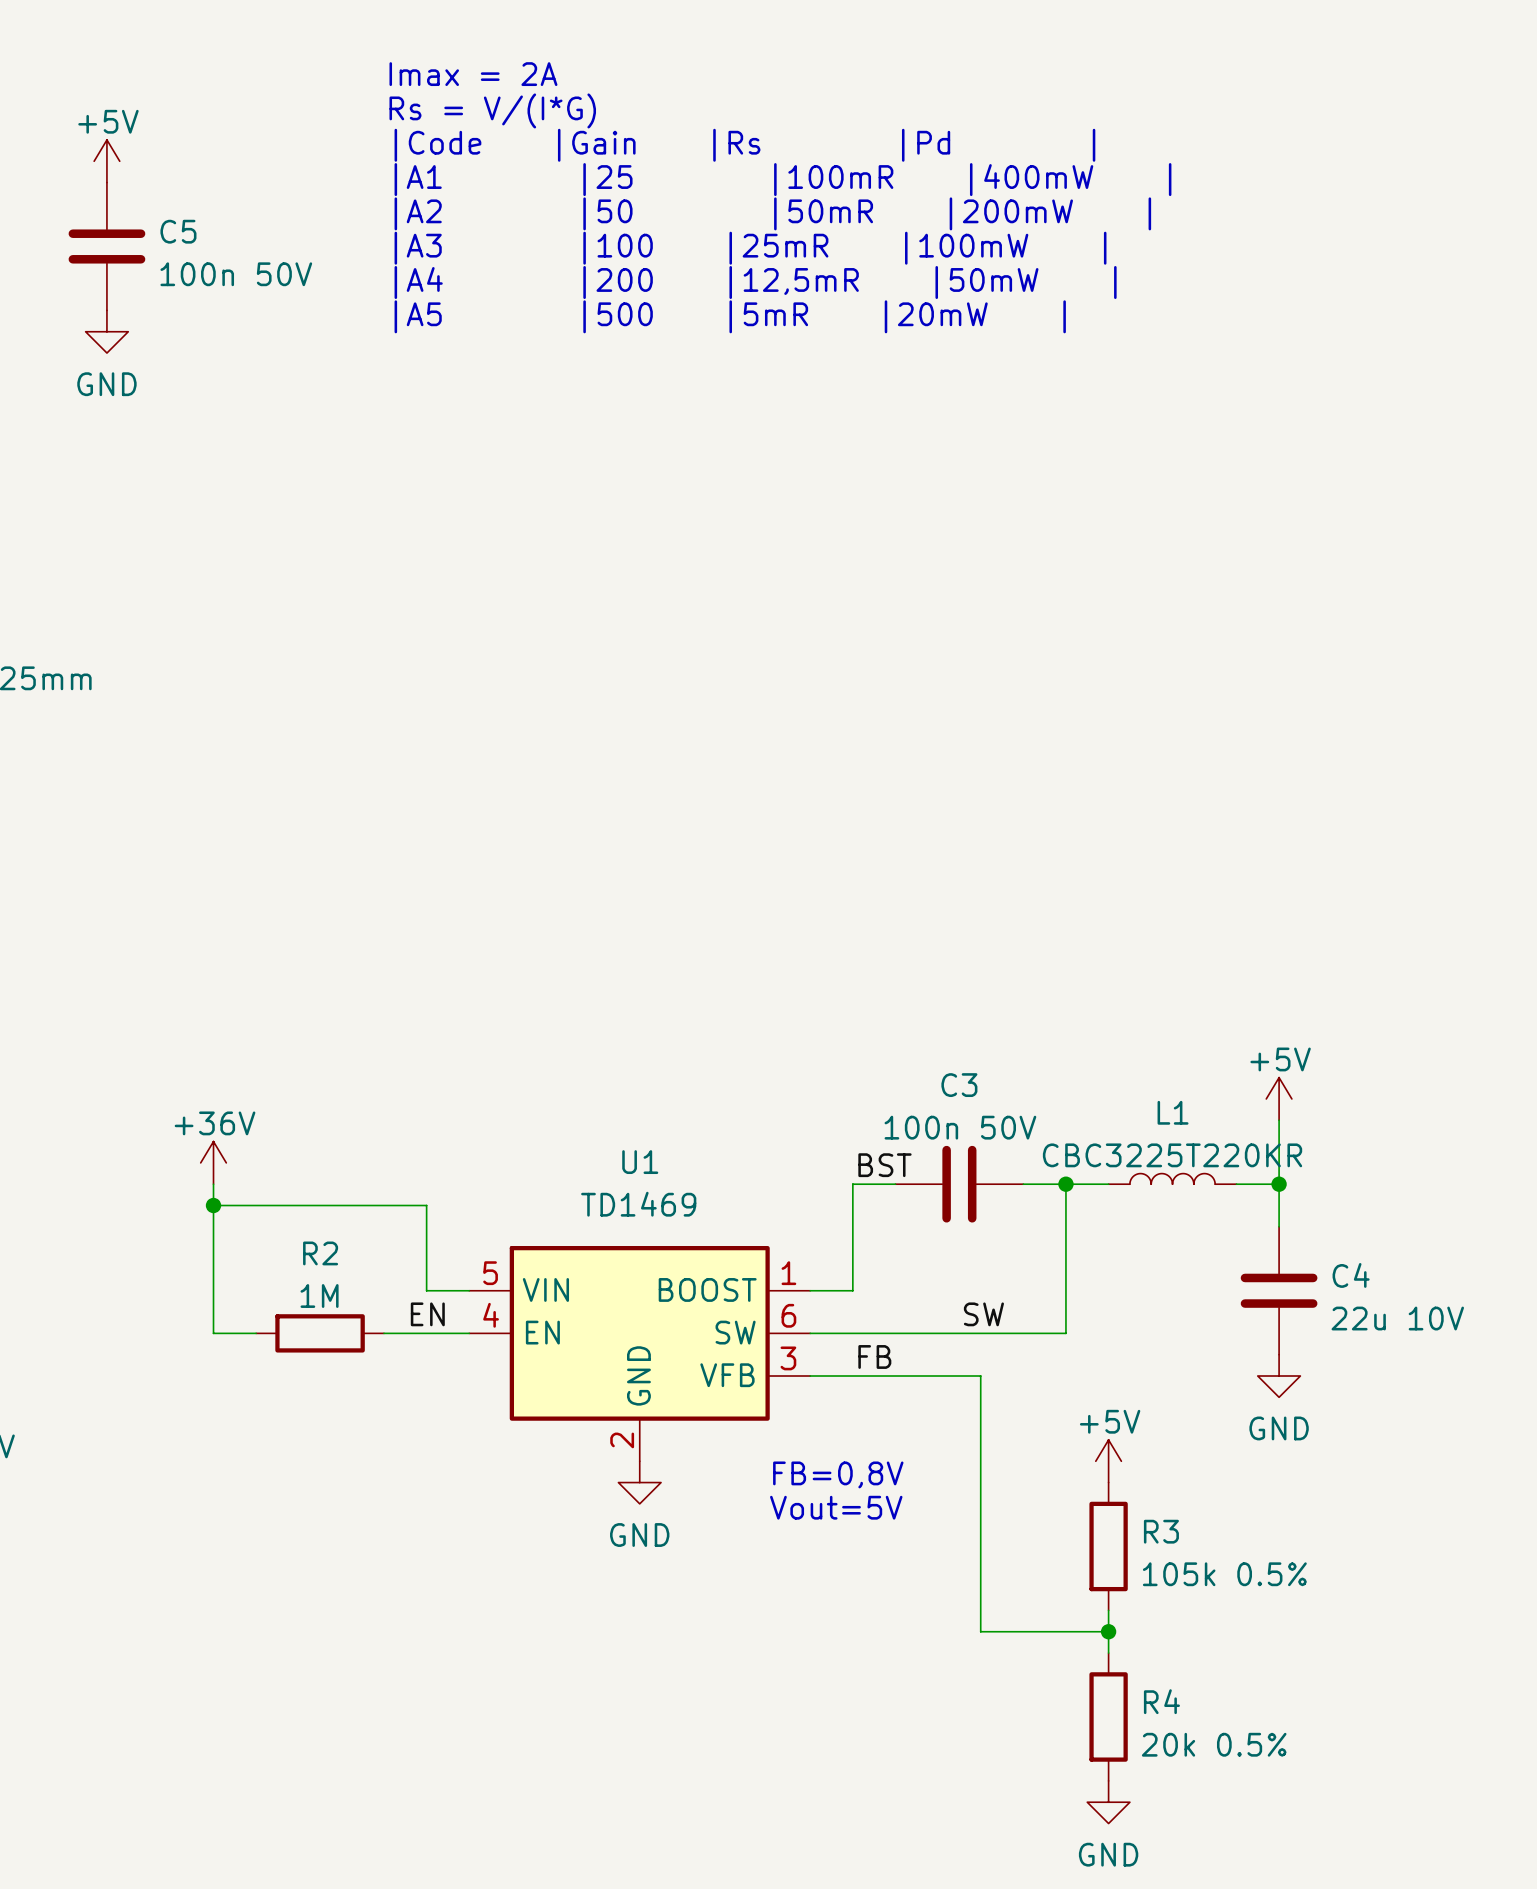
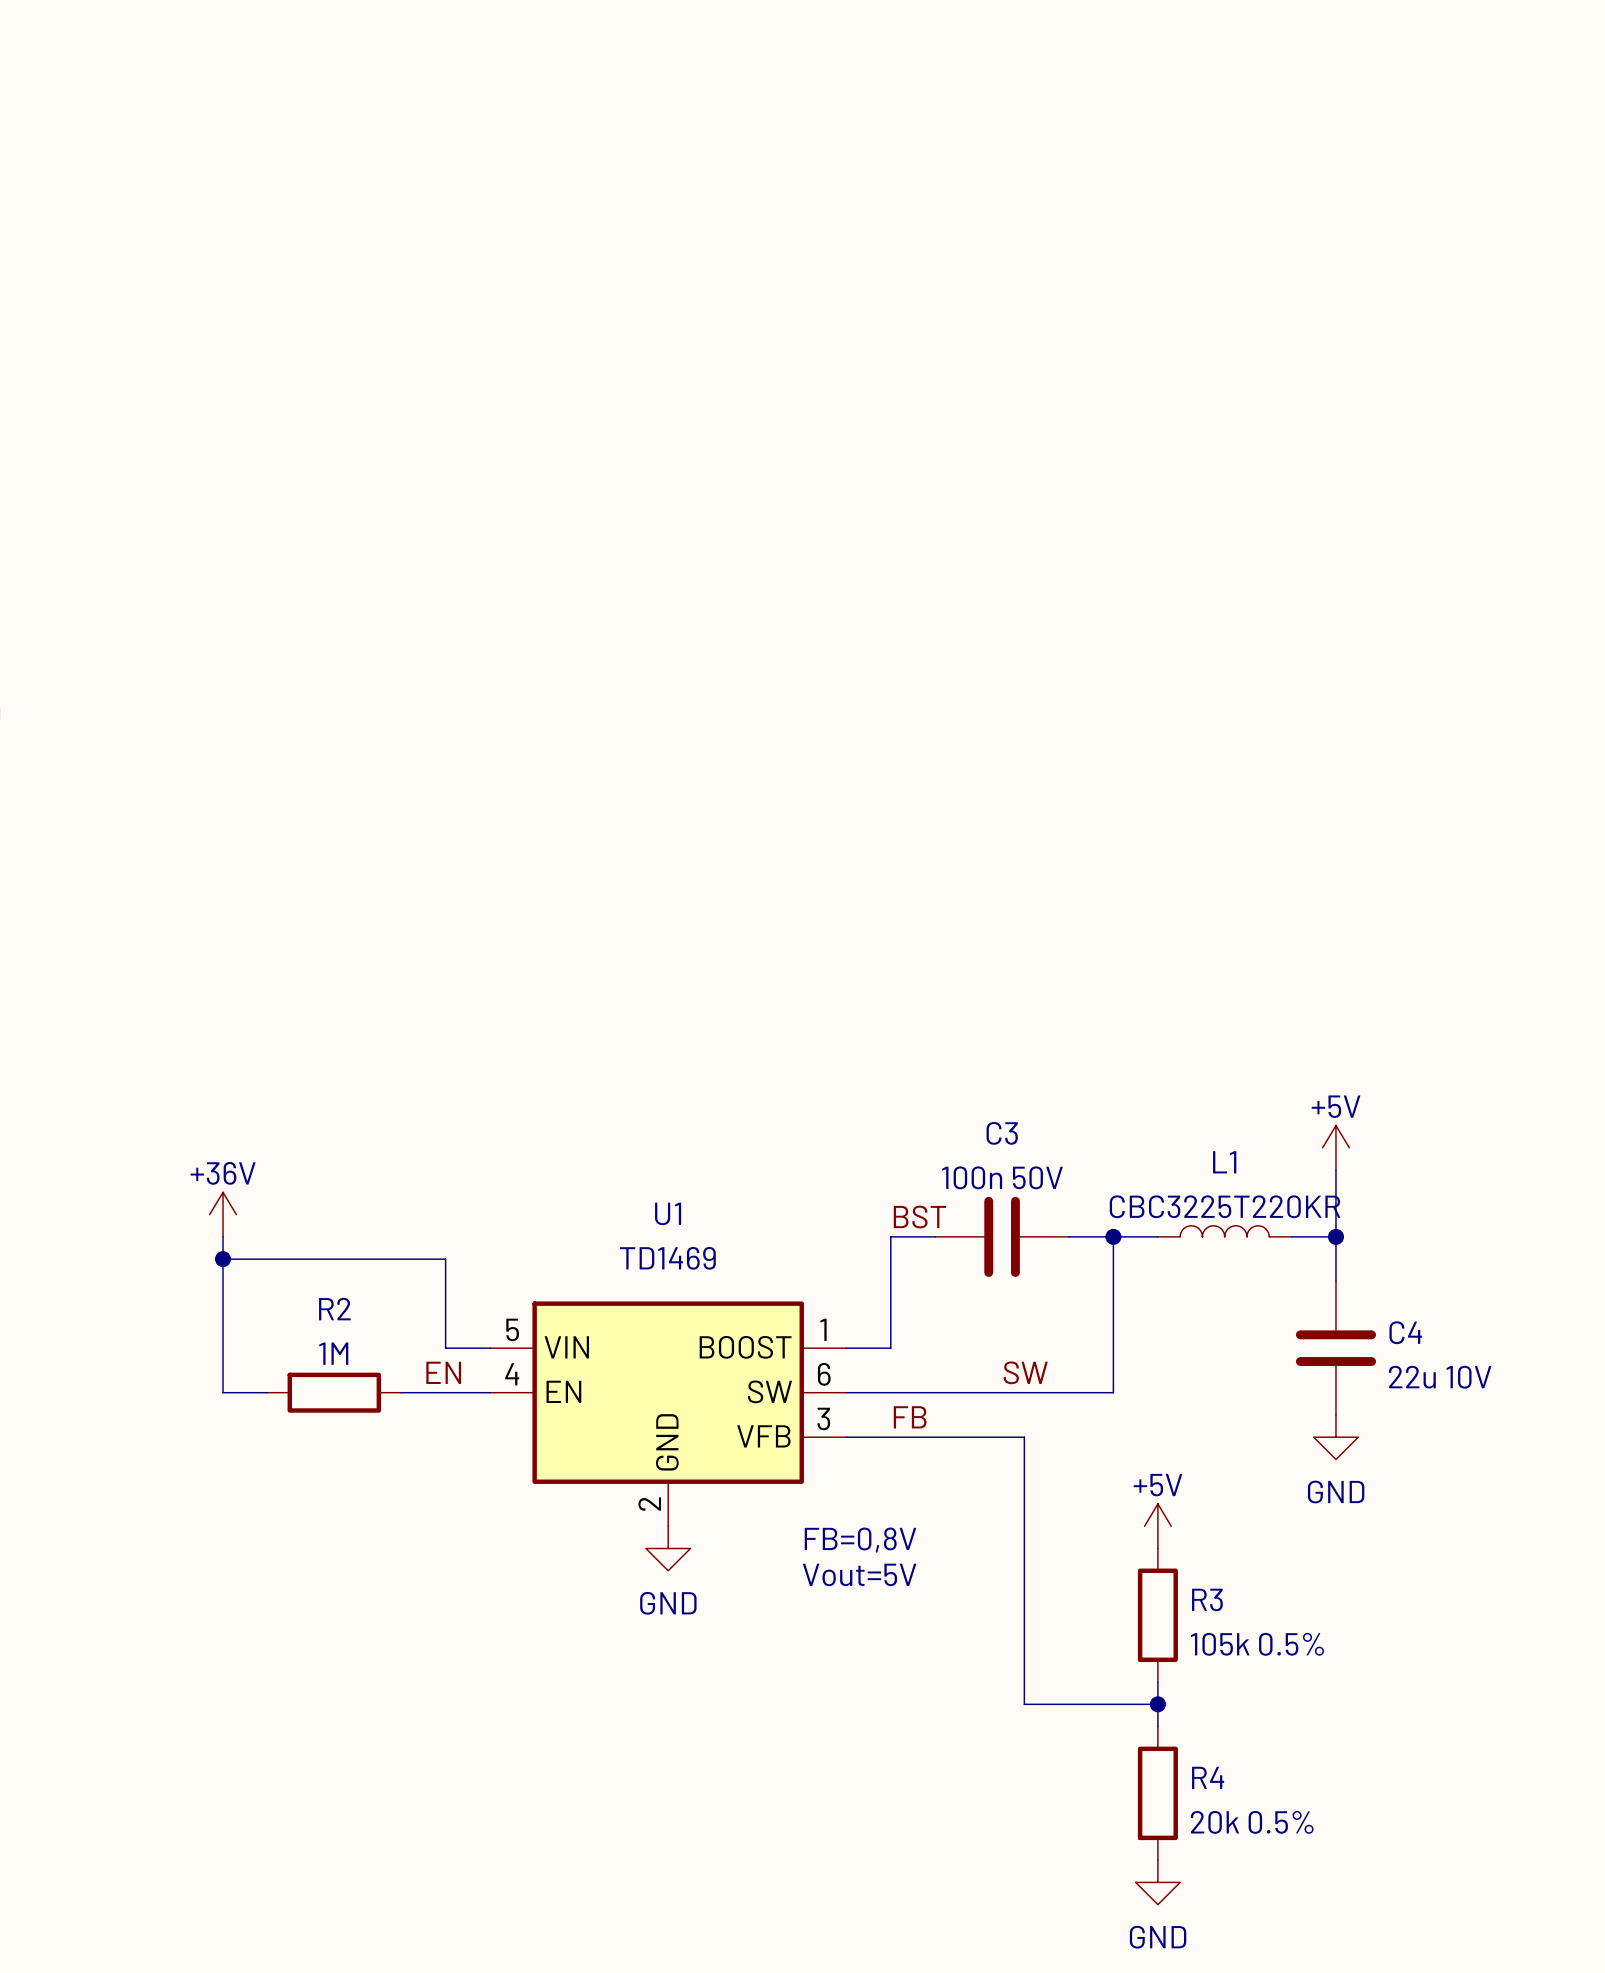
text: Imax = 2A (473, 74) -> none
text: Rs = V/(I*G) (492, 110) -> none
text: |Code |Gain |Rs |Pd | (744, 145) -> none
power symbol: +5V (106, 161) -> none
text: |A1 |25 |100mR |400mW | (782, 179) -> none
text: |A2 |50 |50mR |200mW | (772, 213) -> none
C5: 100n 50V (106, 246) -> none
text: |A3 |100 |25mR |100mW | (750, 248) -> none
text: |A4 |200 |12,5mR |50mW | (755, 282) -> none
text: |A5 |500 |5mR |20mW | (730, 316) -> none
power symbol: GND (106, 331) -> none

